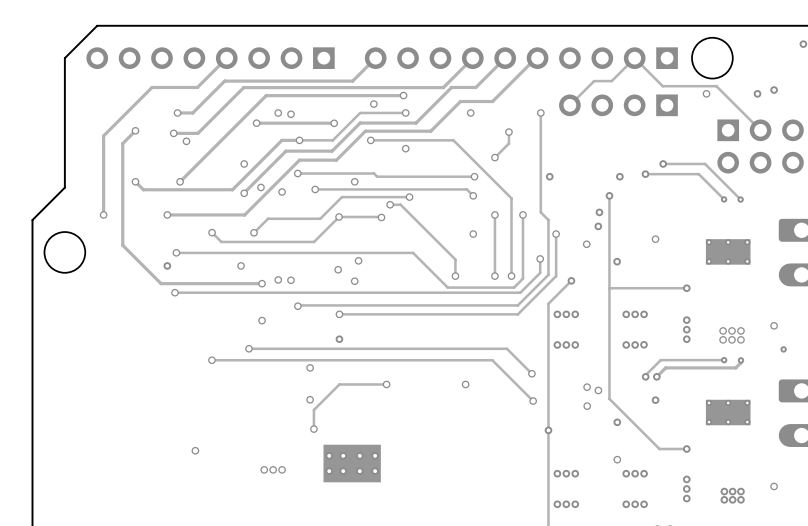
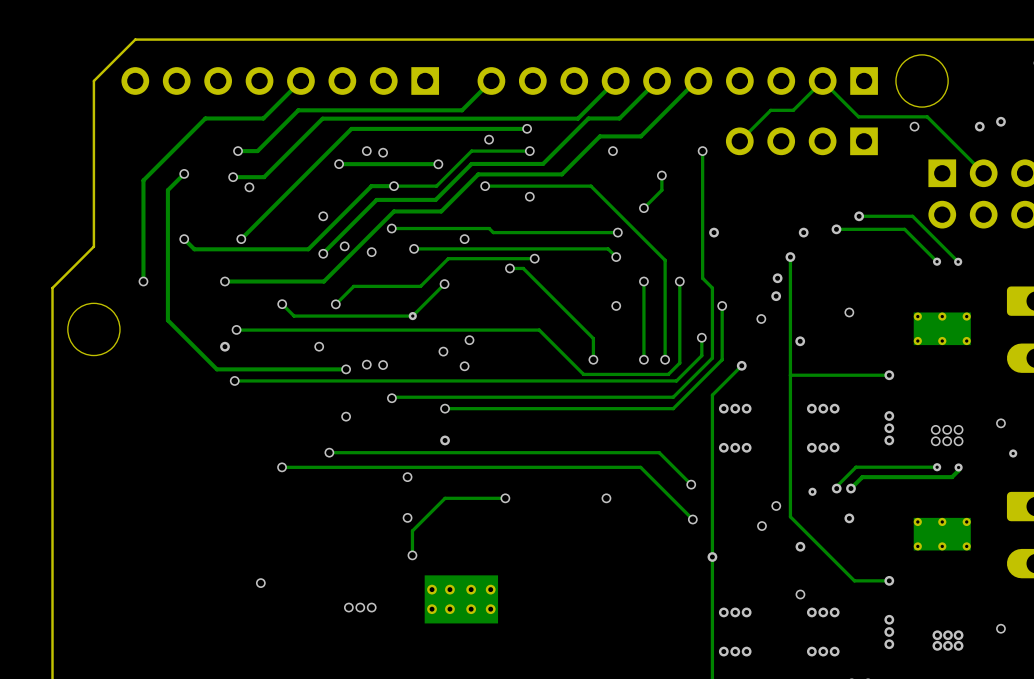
track: (339, 216) (381, 217) -> none
via: (381, 217) -> none
via: none -> (412, 316)
via: none -> (812, 491)
via: (587, 387) -> none

